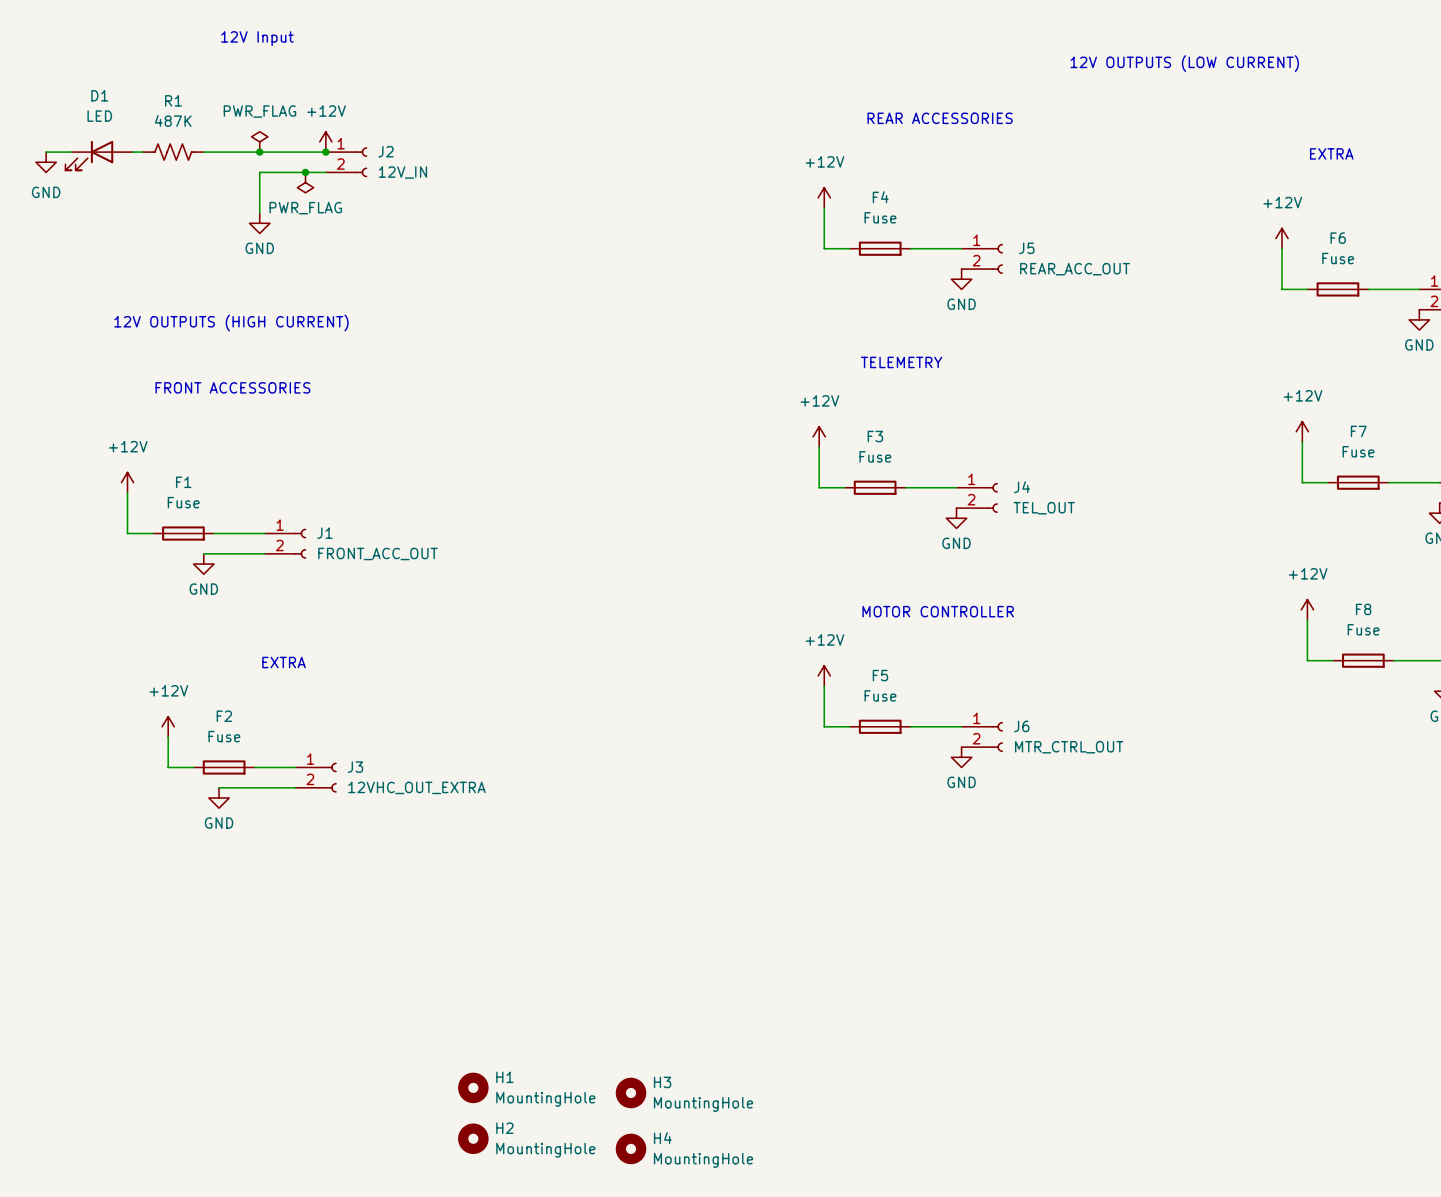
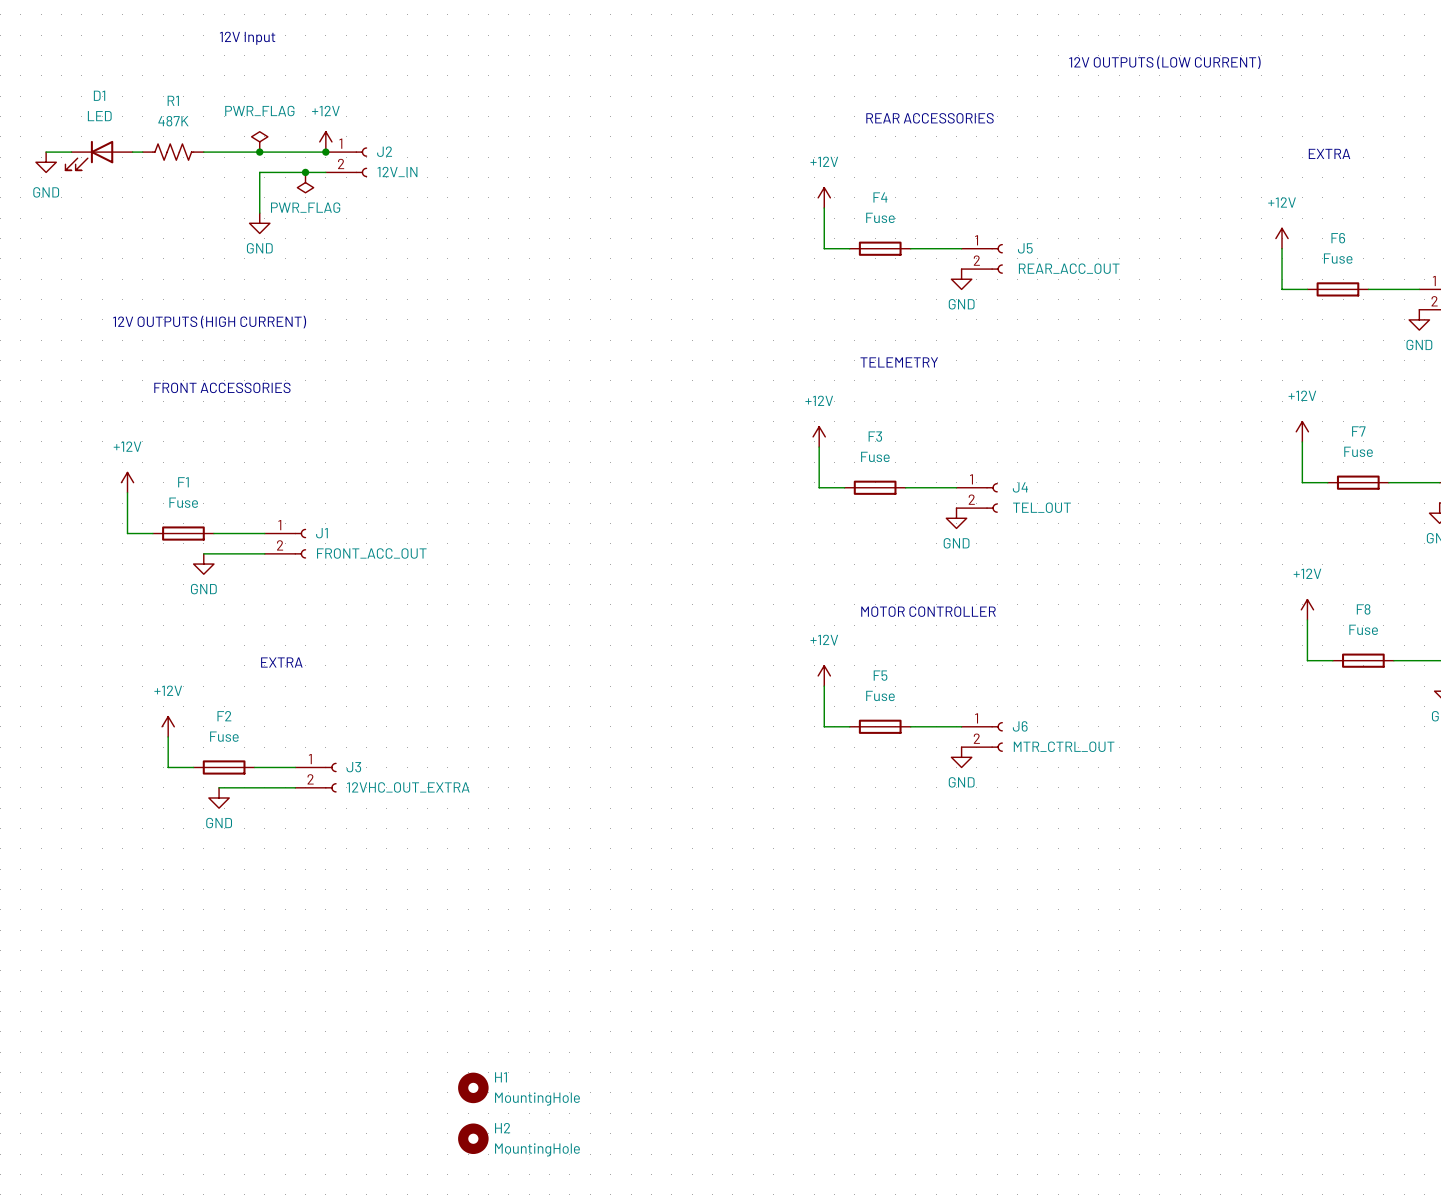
H3: MountingHole (631, 1092) -> none
H4: MountingHole (631, 1148) -> none

